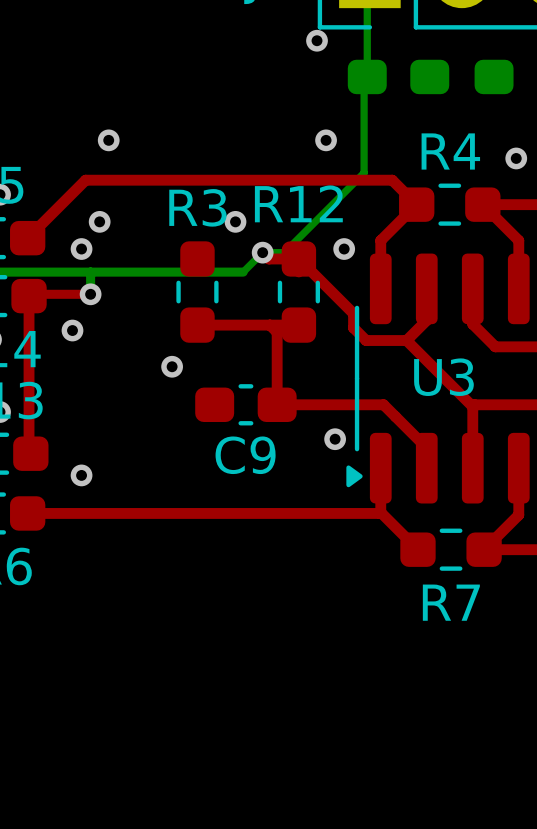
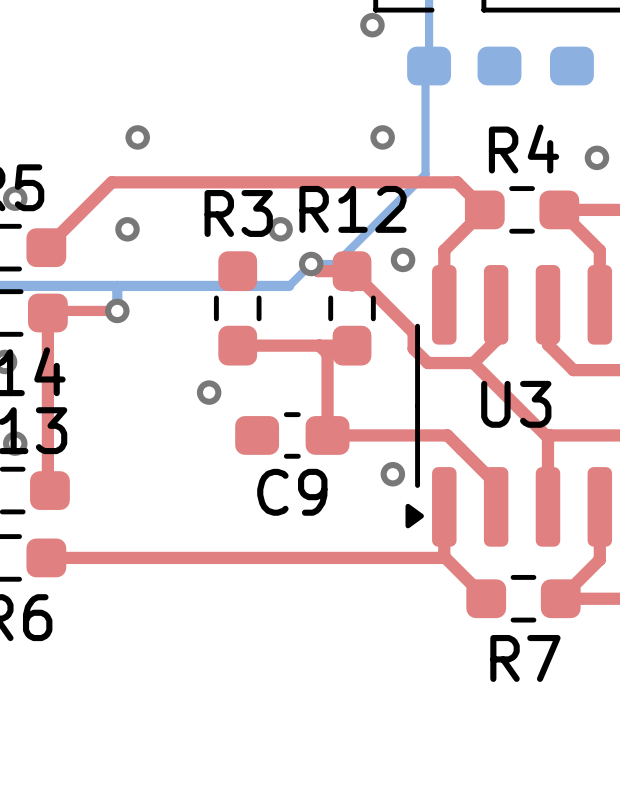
via: (81, 249) -> none
via: (72, 330) -> none
via: (81, 475) -> none

